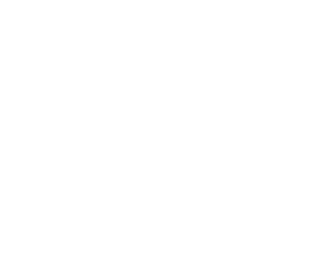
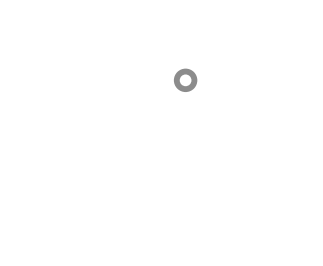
via: none -> (185, 80)

